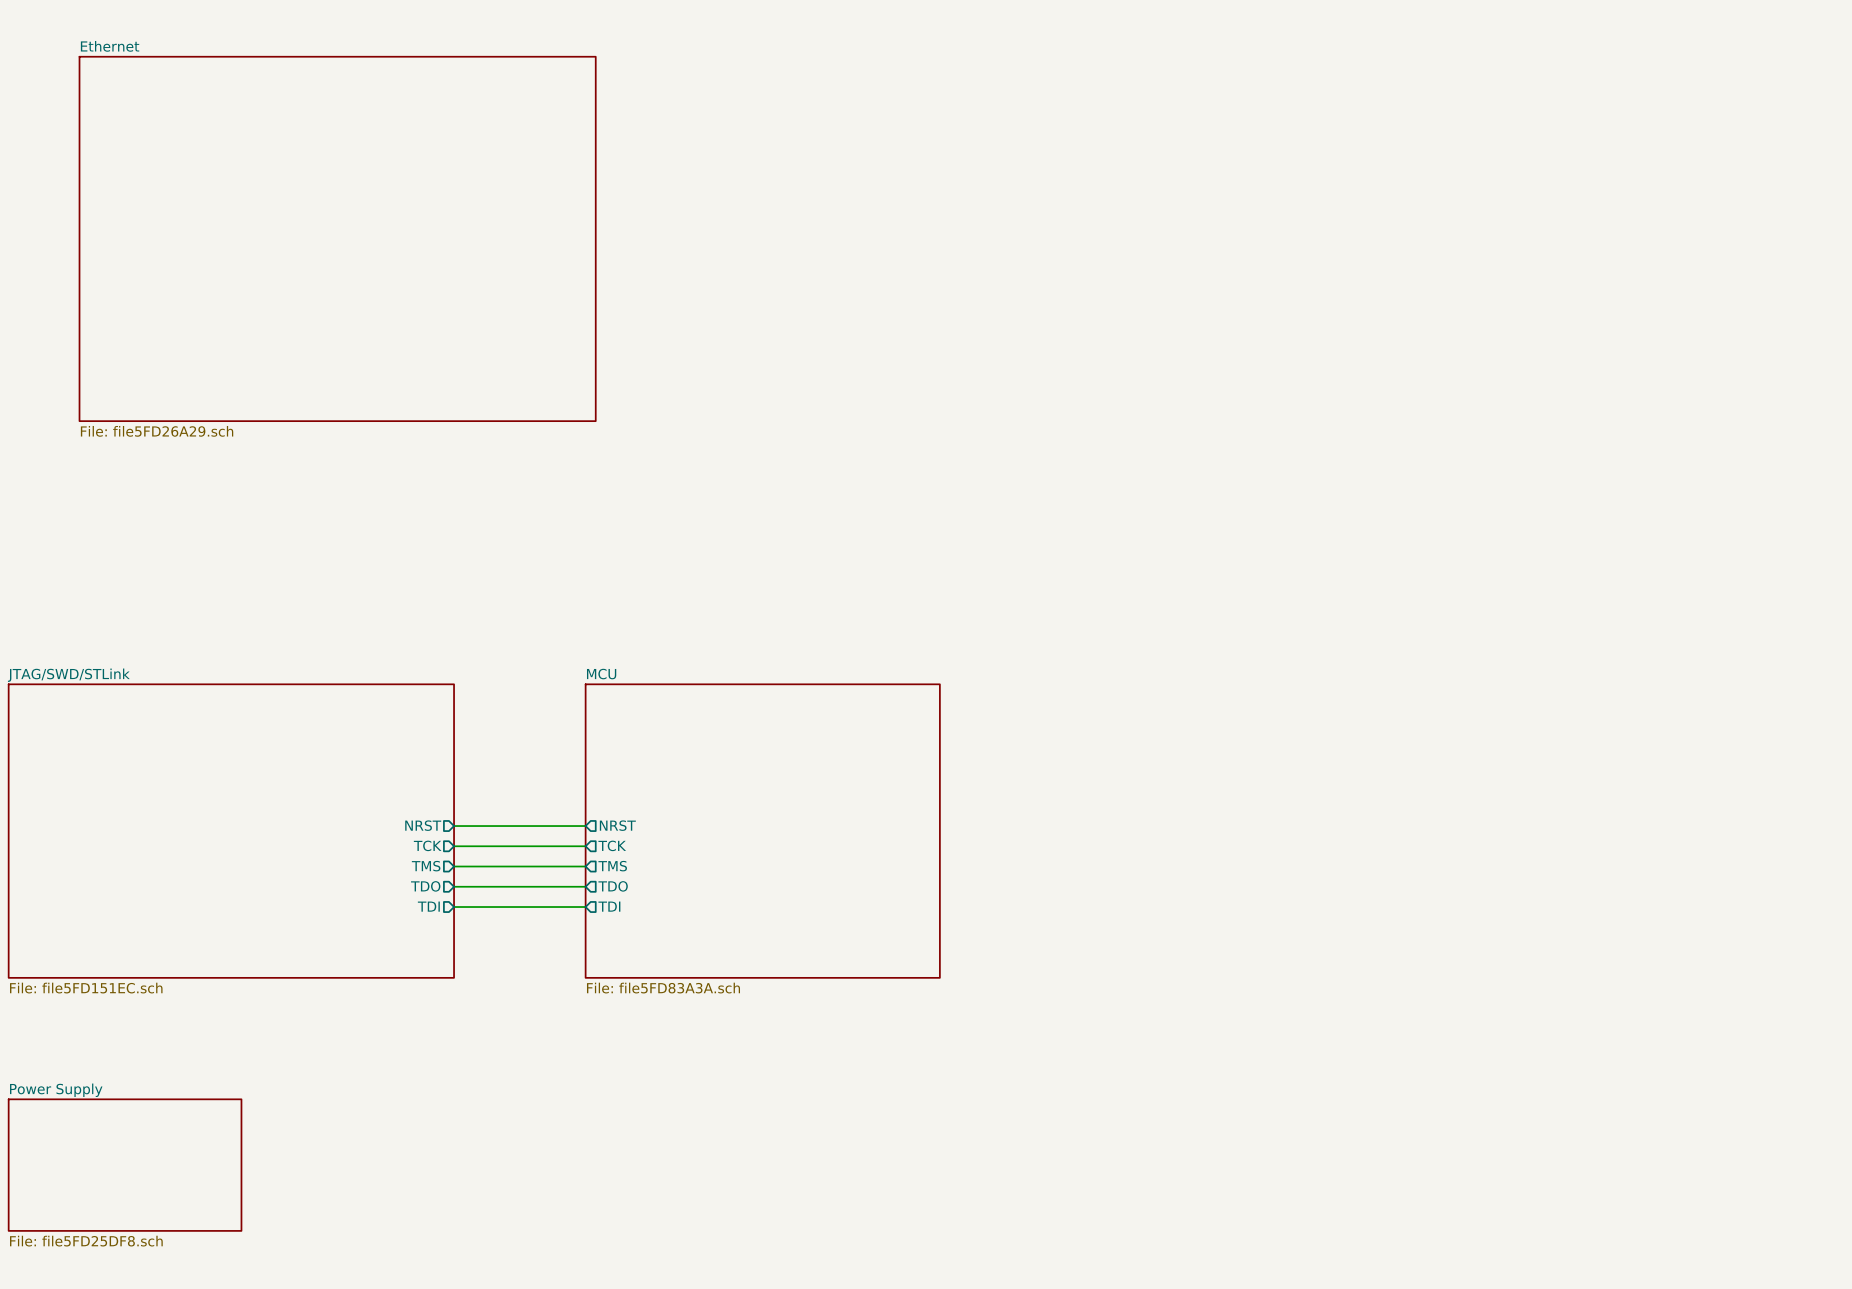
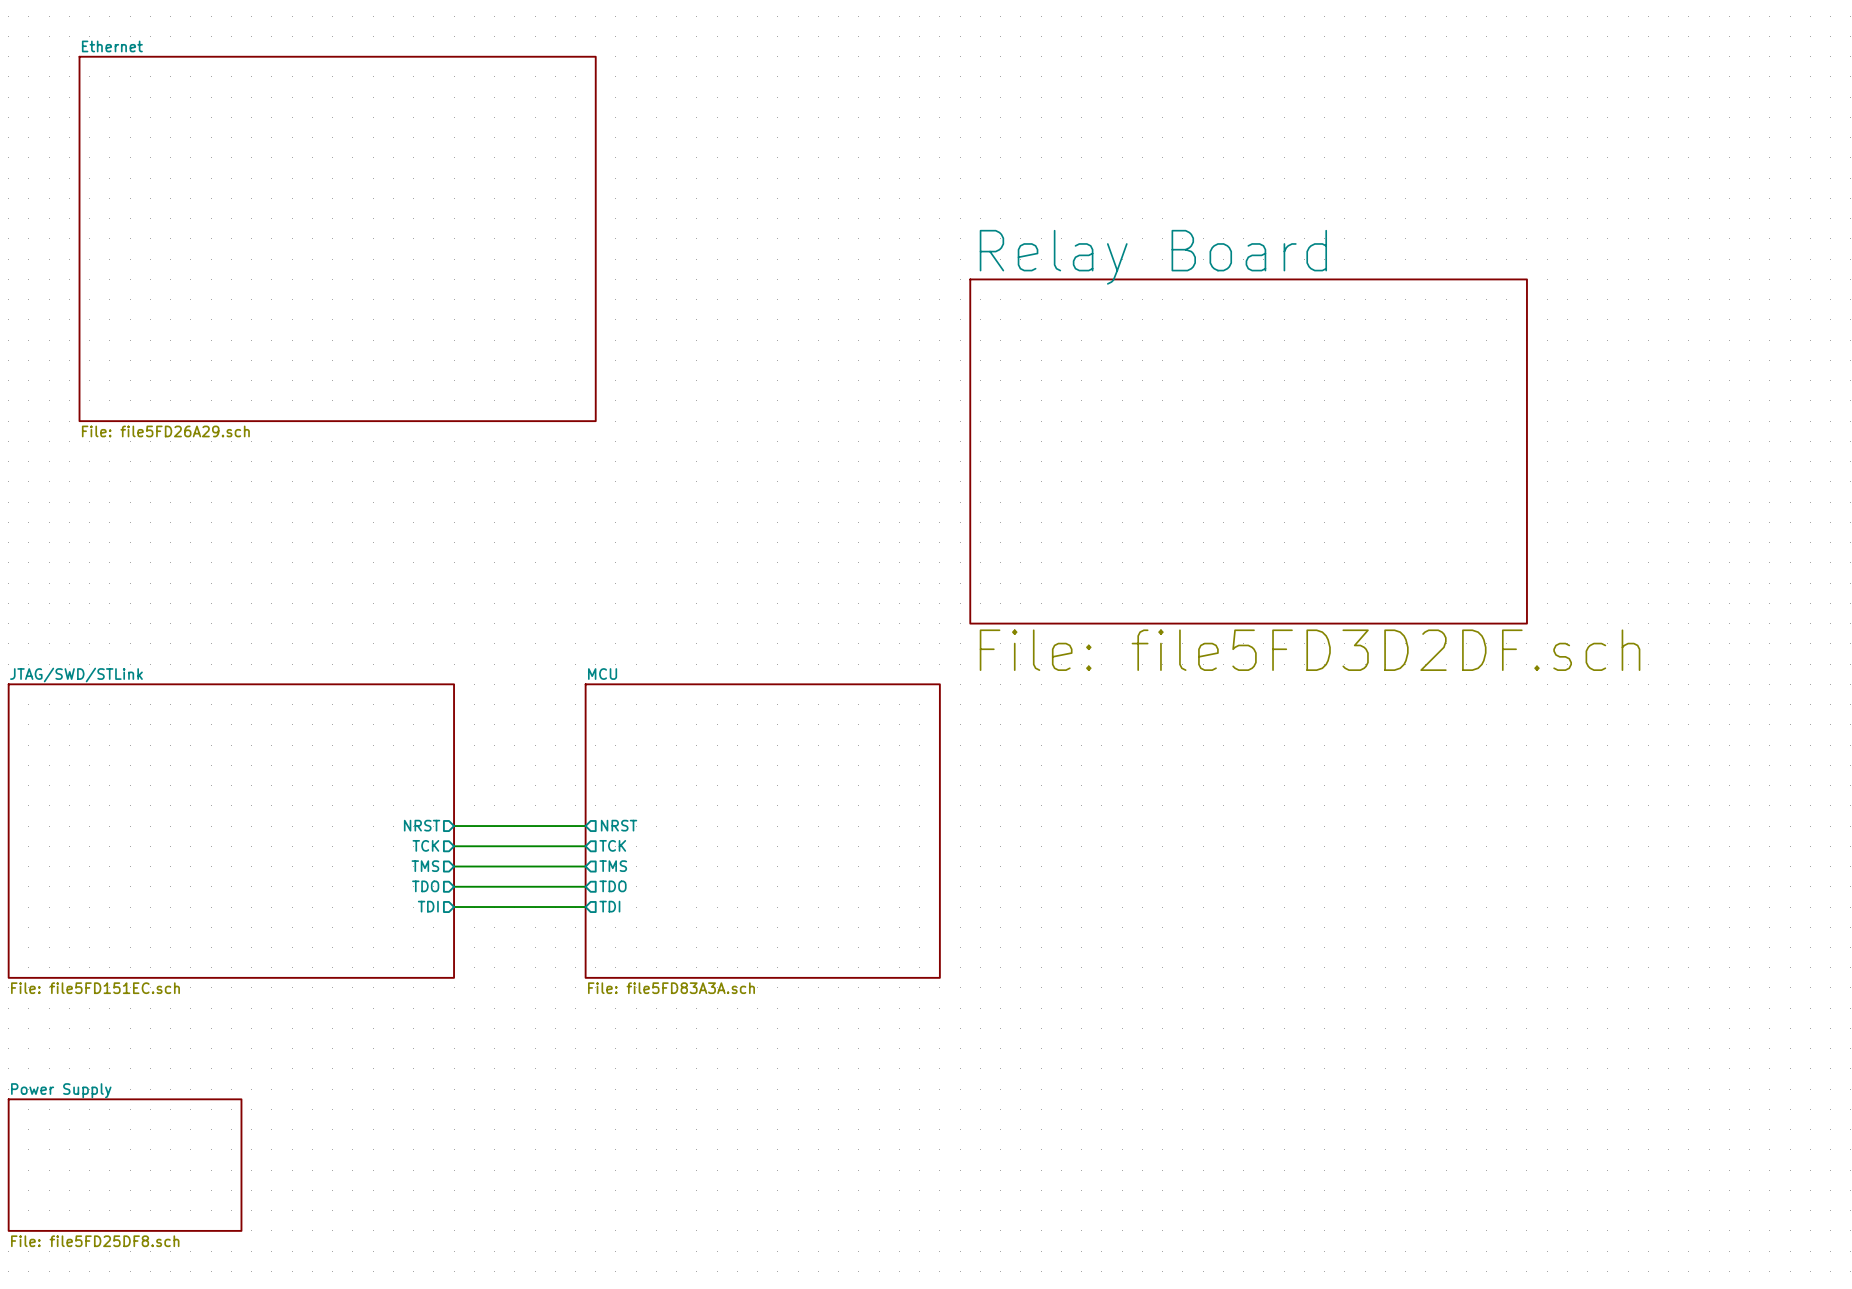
sheet Relay Board: none -> File: file5FD3D2DF.sch (1248, 451)

